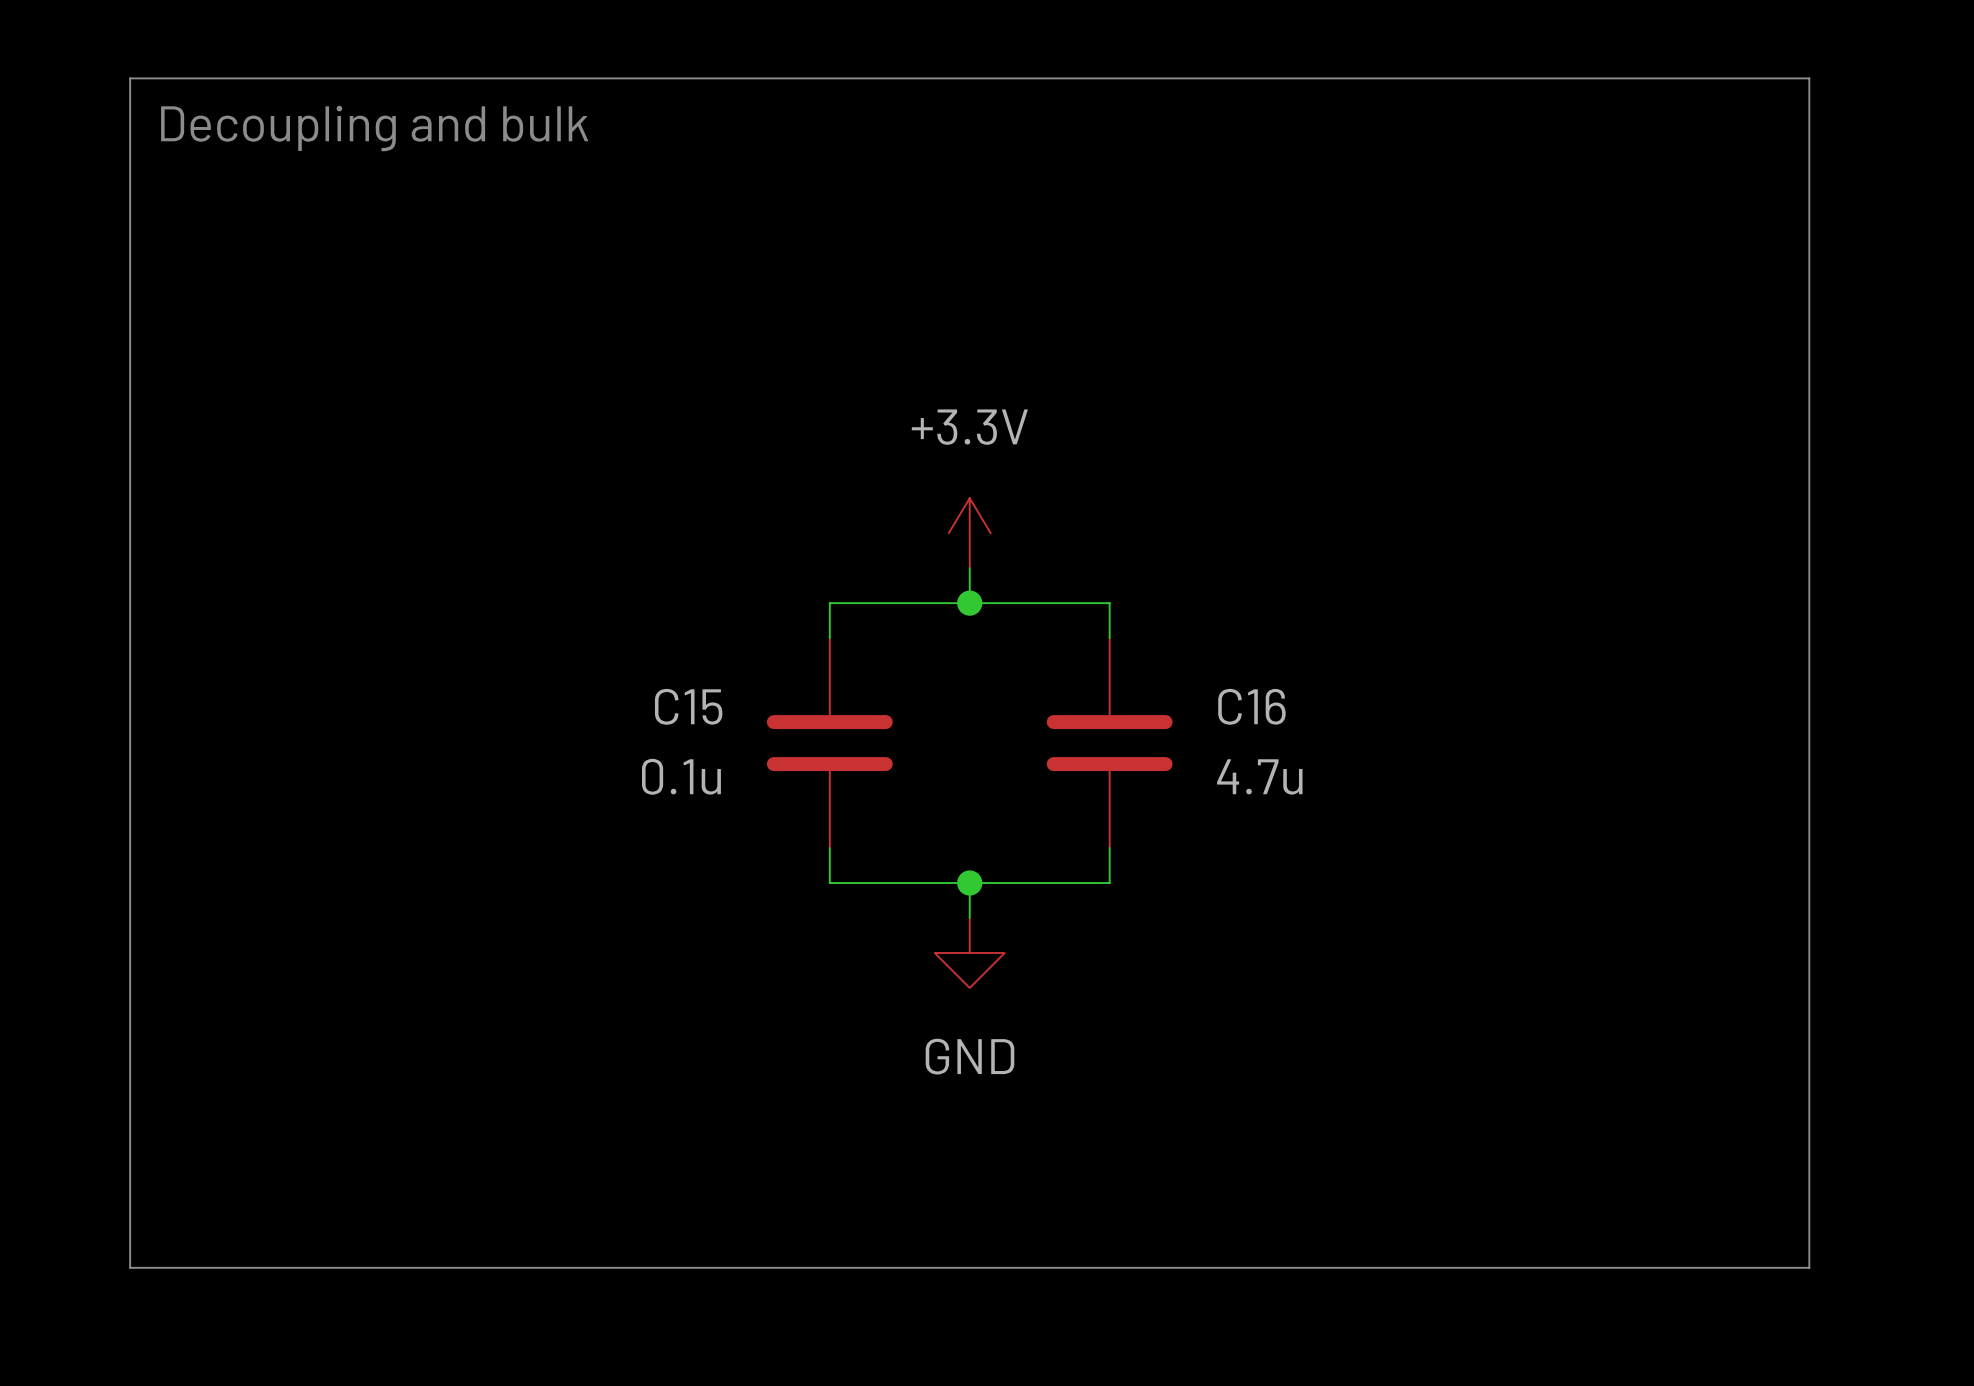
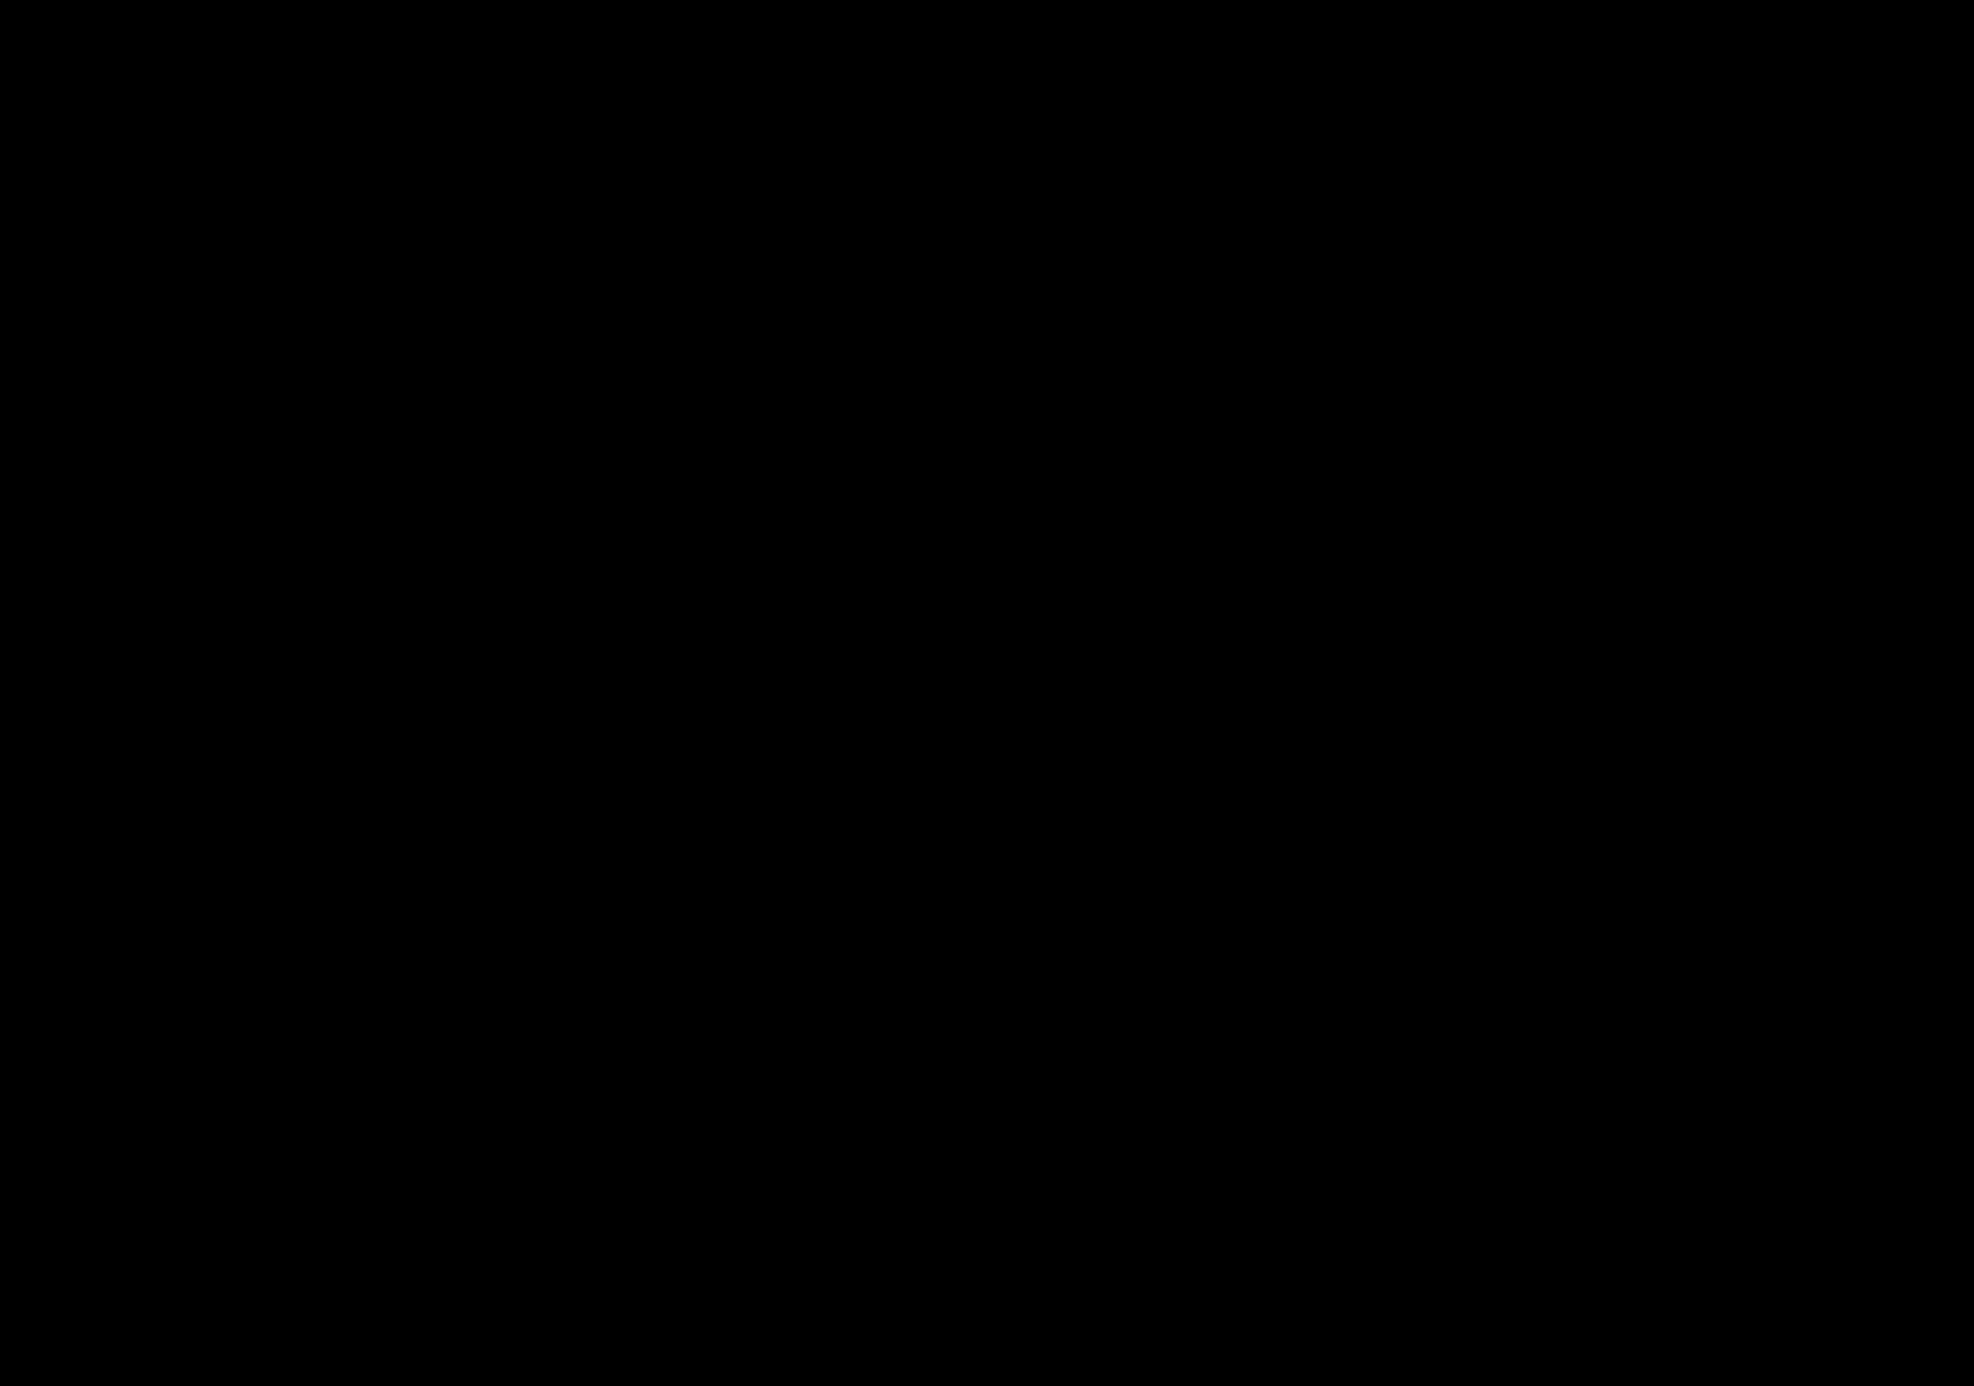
line: (130, 78) (1809, 78) (1809, 1267) (130, 1267) (130, 78) -> none
text: Decoupling and bulk (374, 128) -> none
power symbol: +3.3V (969, 533) -> none
wire: (969, 568) (969, 603) -> none
junction: (969, 603) -> none
wire: (829, 638) (829, 603) (1109, 603) (1109, 638) -> none
C15: 0.1u (829, 743) -> none
C16: 4.7u (1109, 743) -> none
wire: (829, 848) (829, 883) (1109, 883) (1109, 848) -> none
wire: (969, 883) (969, 917) -> none
junction: (969, 883) -> none
power symbol: GND (969, 952) -> none

